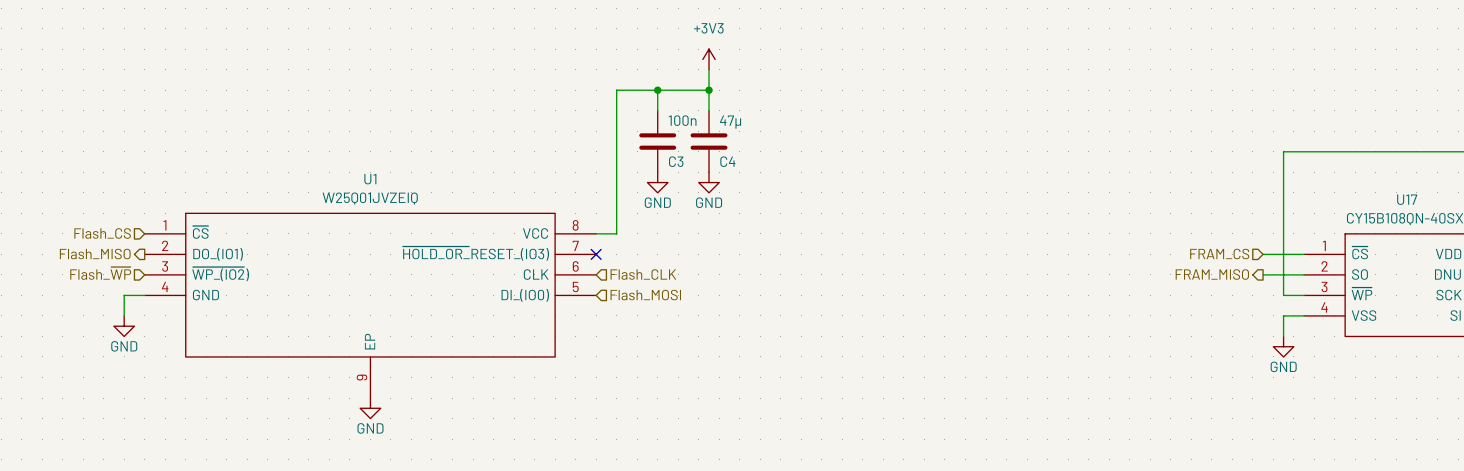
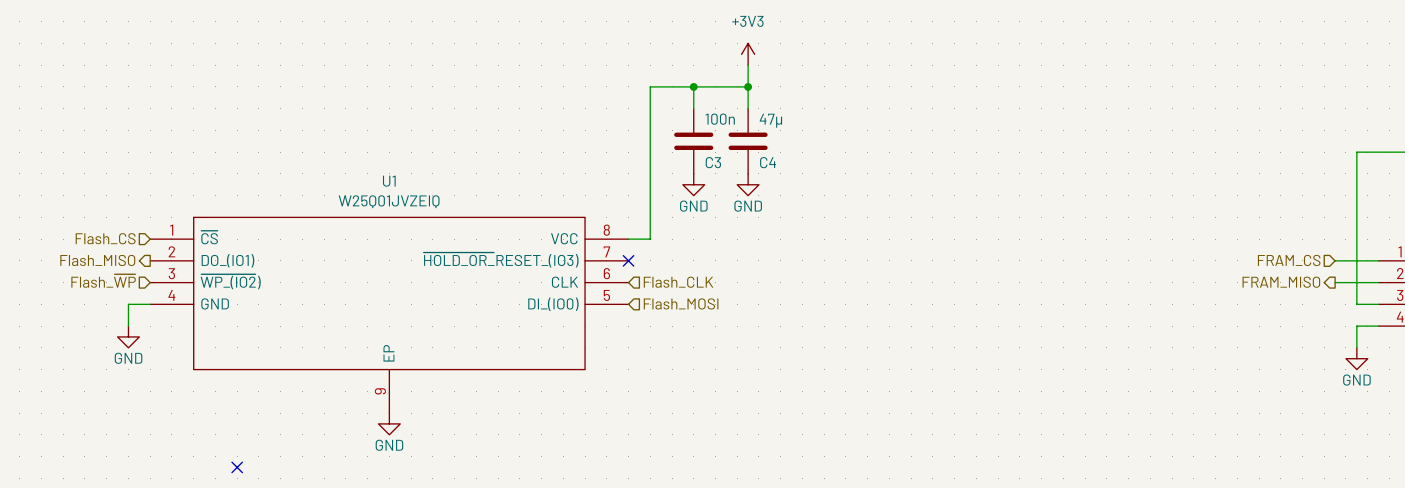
no-connect mark: none -> (237, 467)

